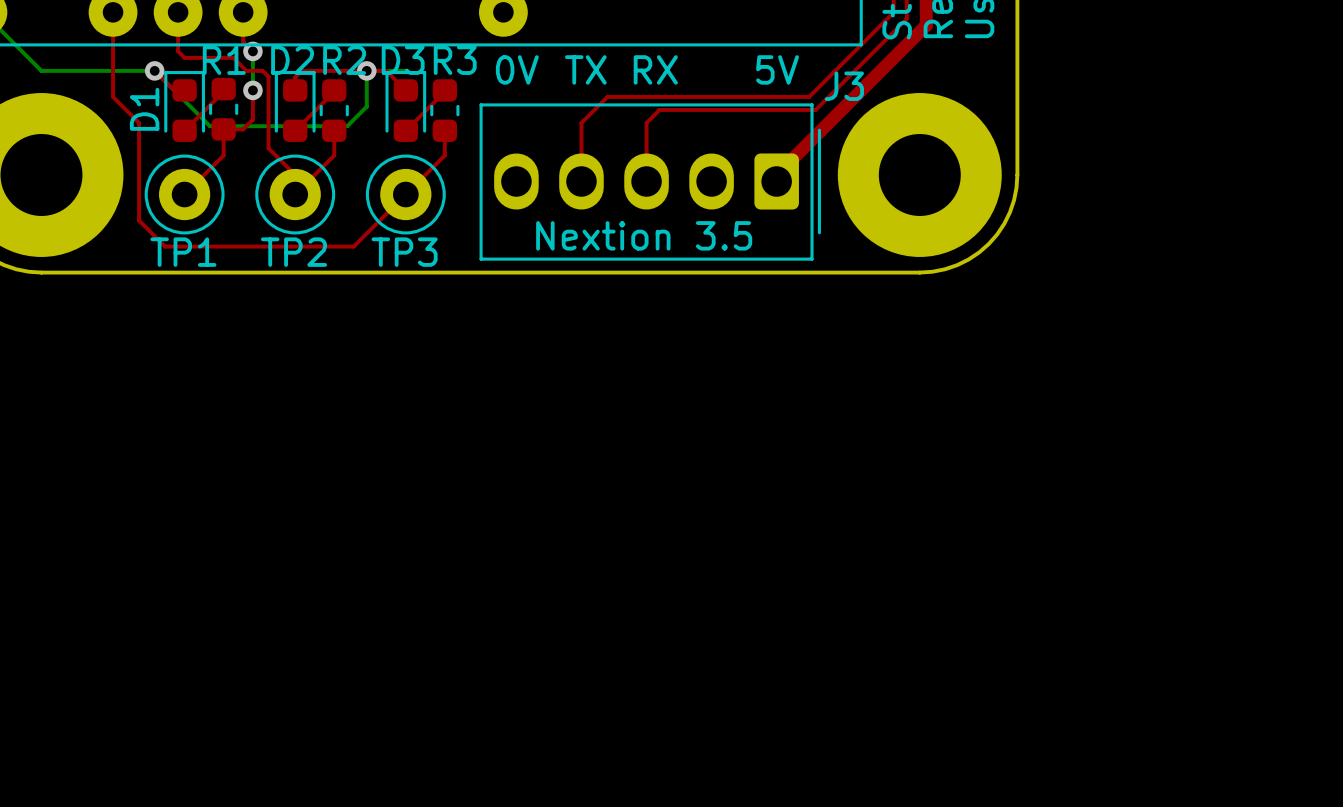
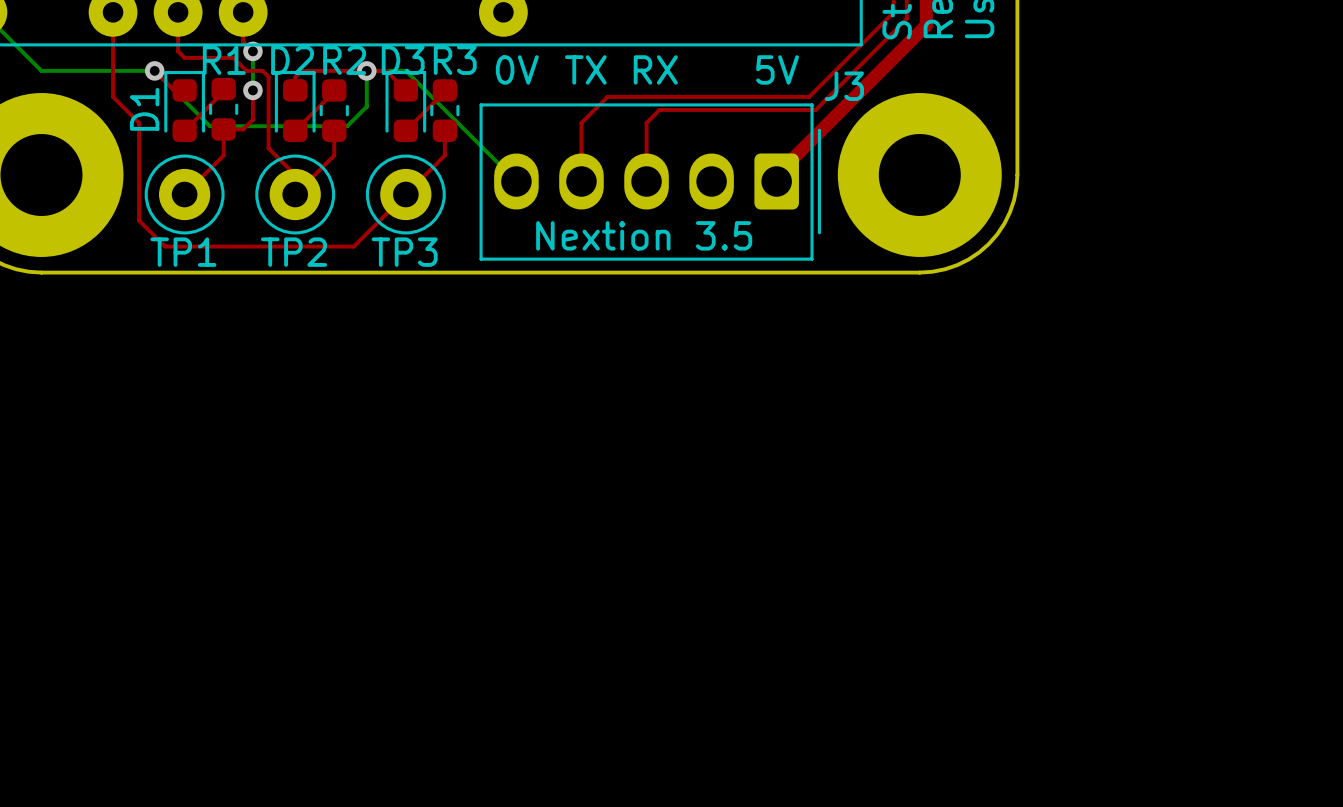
bottom track: none -> (405, 70) (516, 181)

